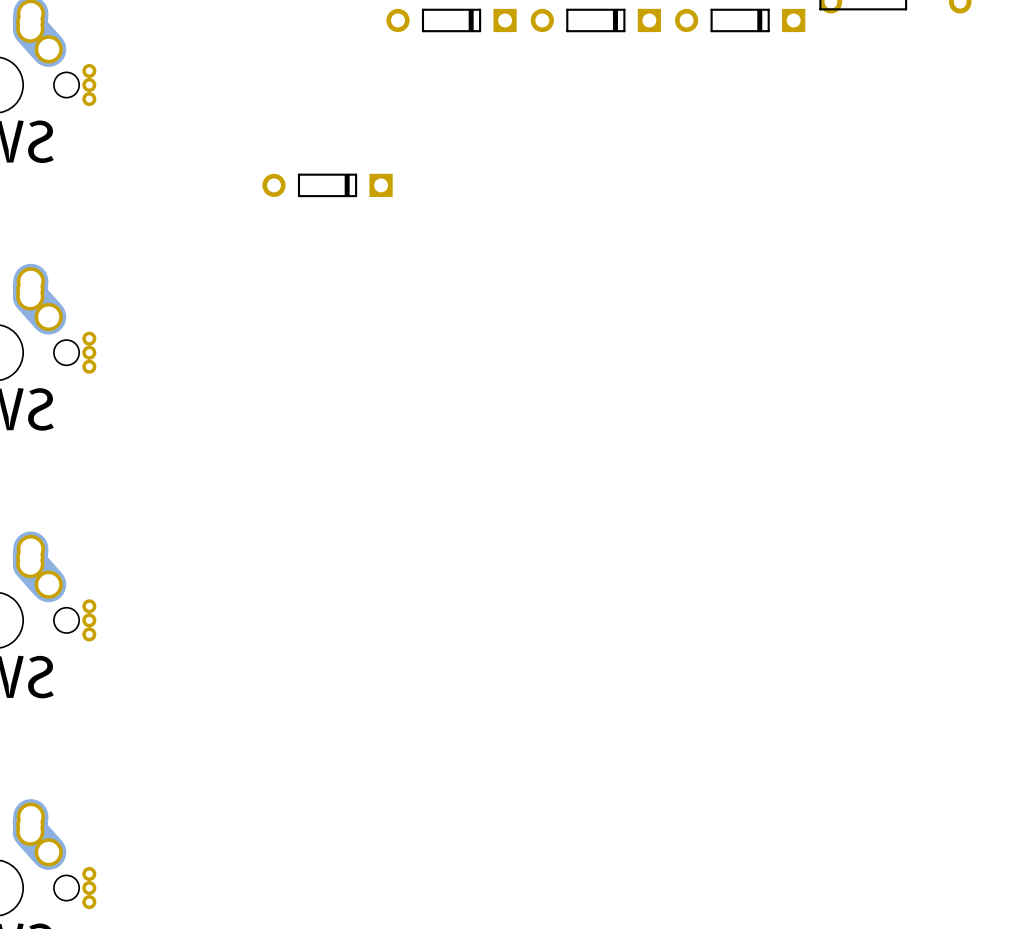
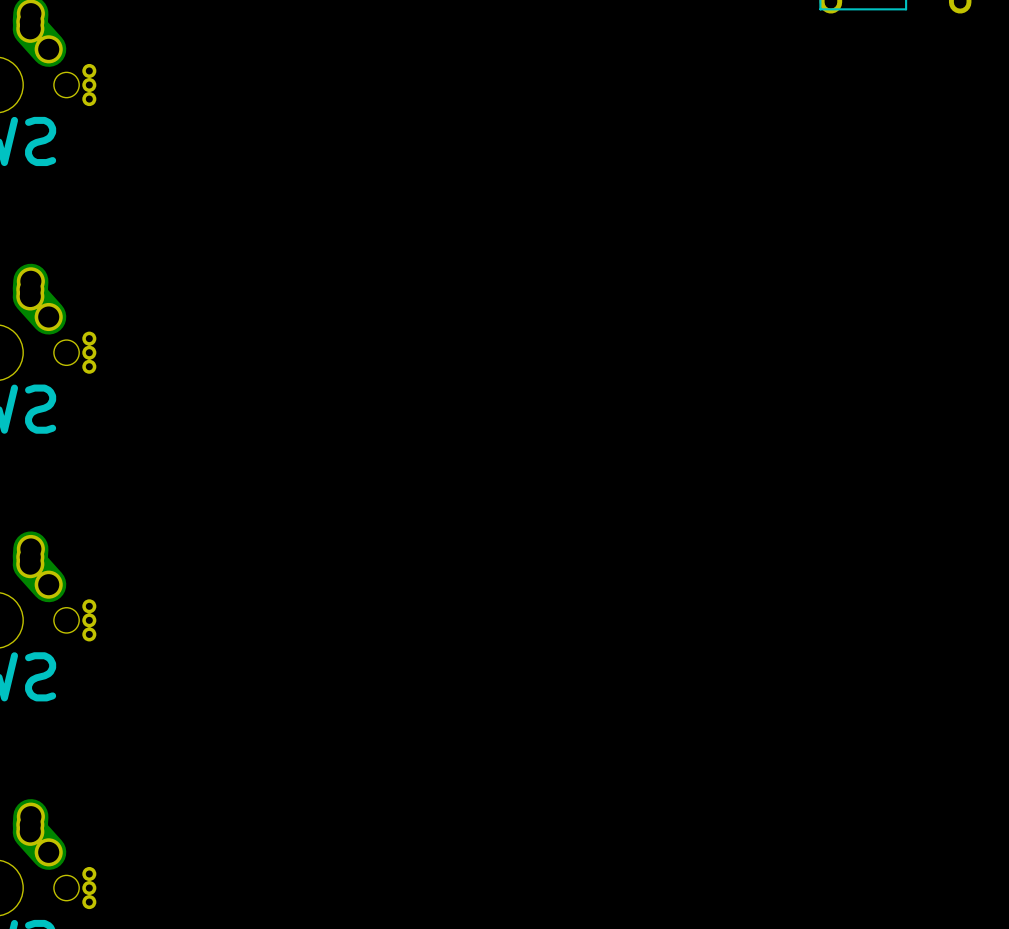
part: (451, 20) -> none
part: (595, 20) -> none
part: (740, 20) -> none
part: (327, 185) -> none

